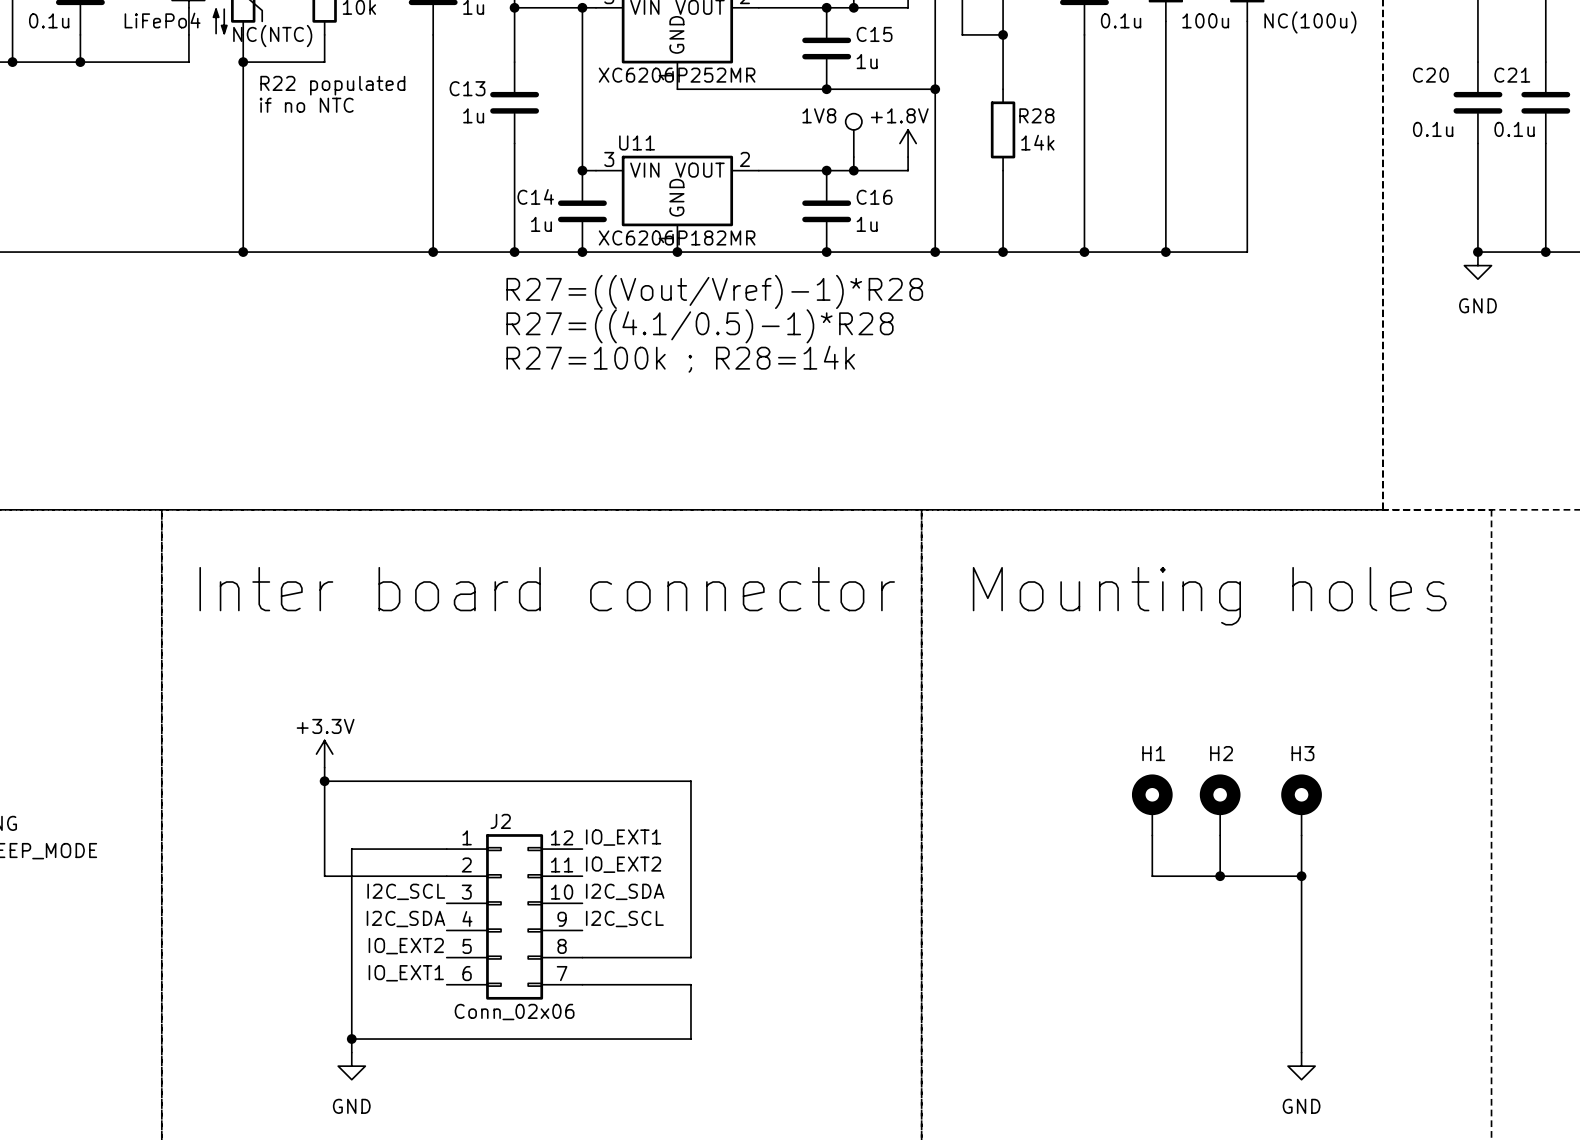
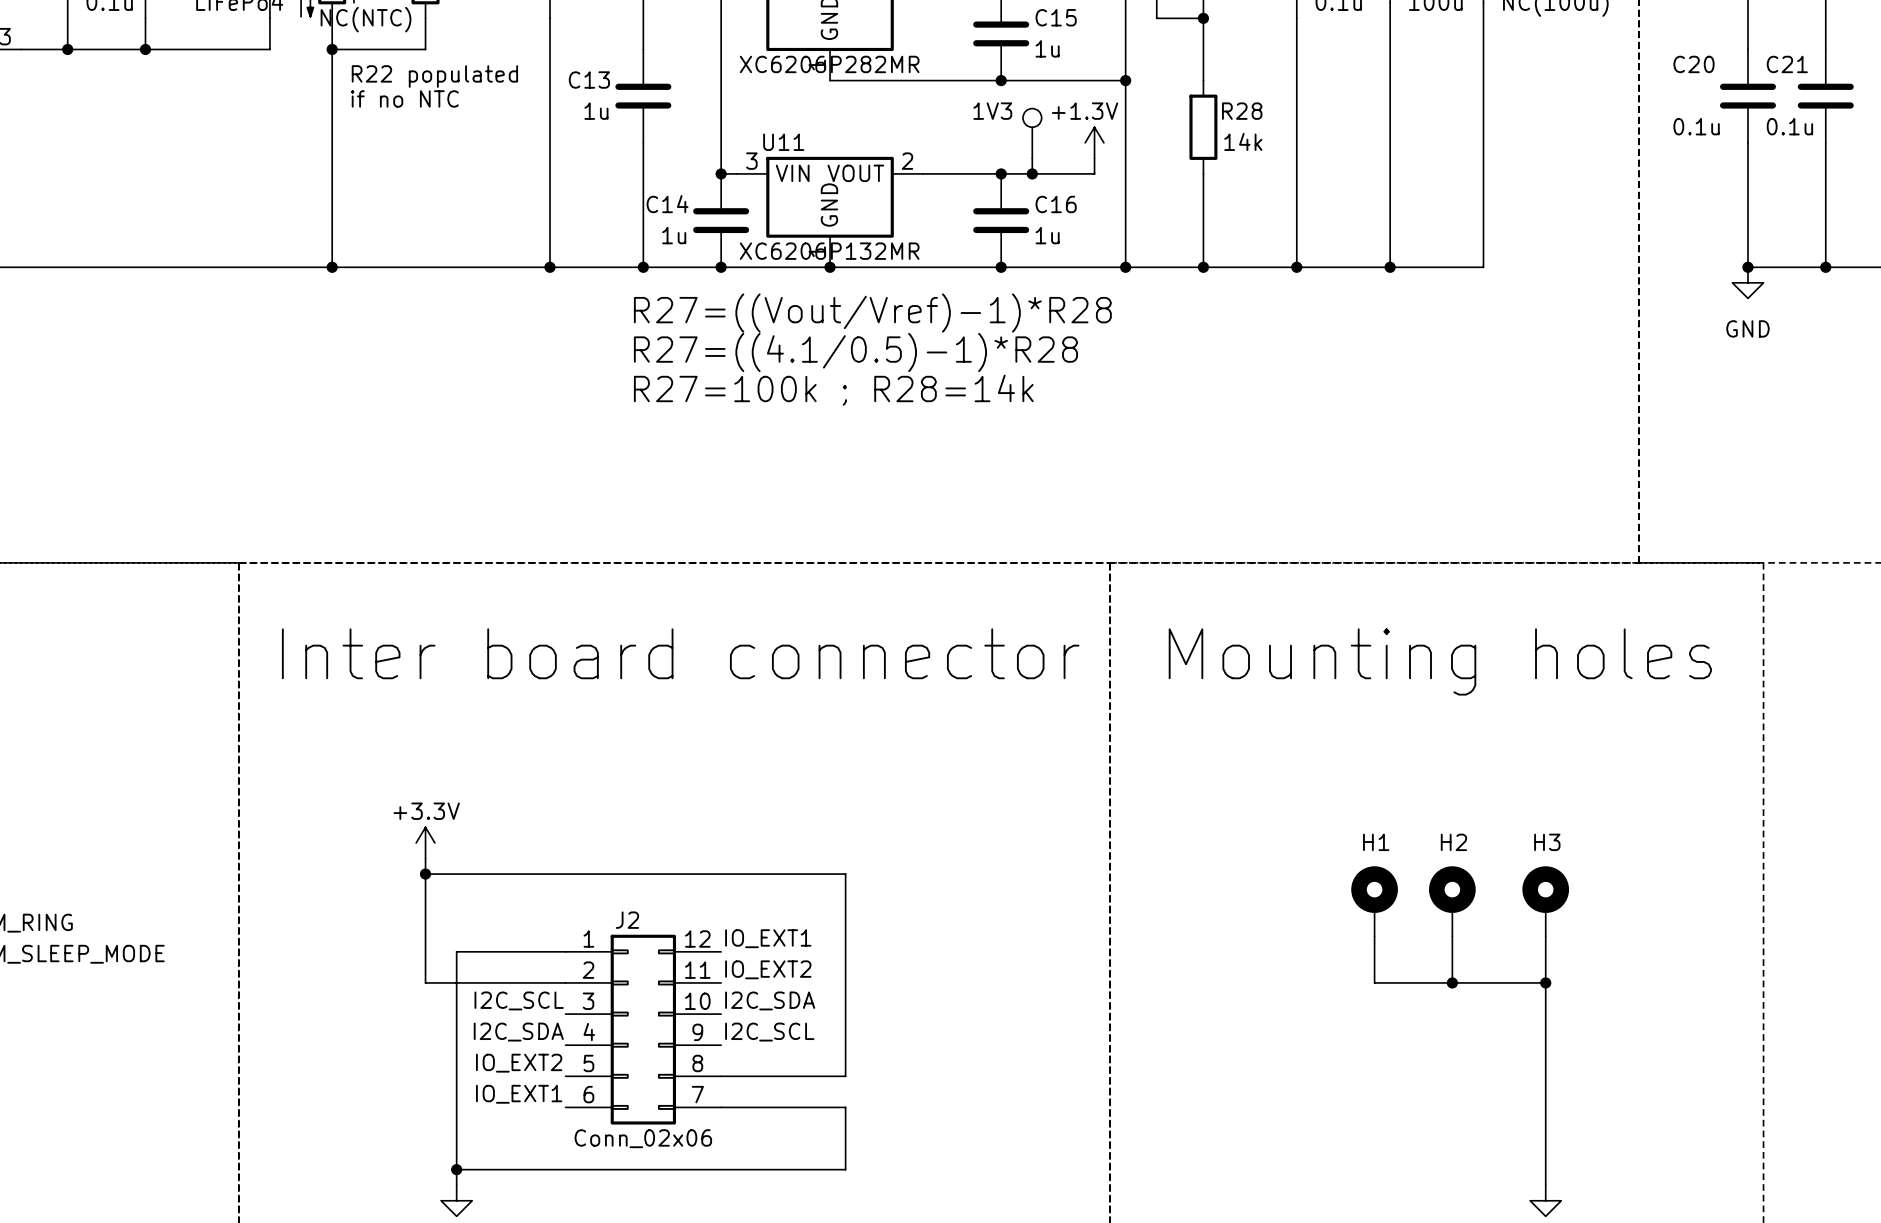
part value: XC6206P252MR (677, 75) -> XC6206P282MR (829, 64)
1V8 name: 1V8 (819, 115) -> 1V3 (992, 111)
power symbol: +1.8V (908, 143) -> +1.3V (1094, 142)
U11 value: XC6206P182MR (677, 237) -> XC6206P132MR (829, 251)

